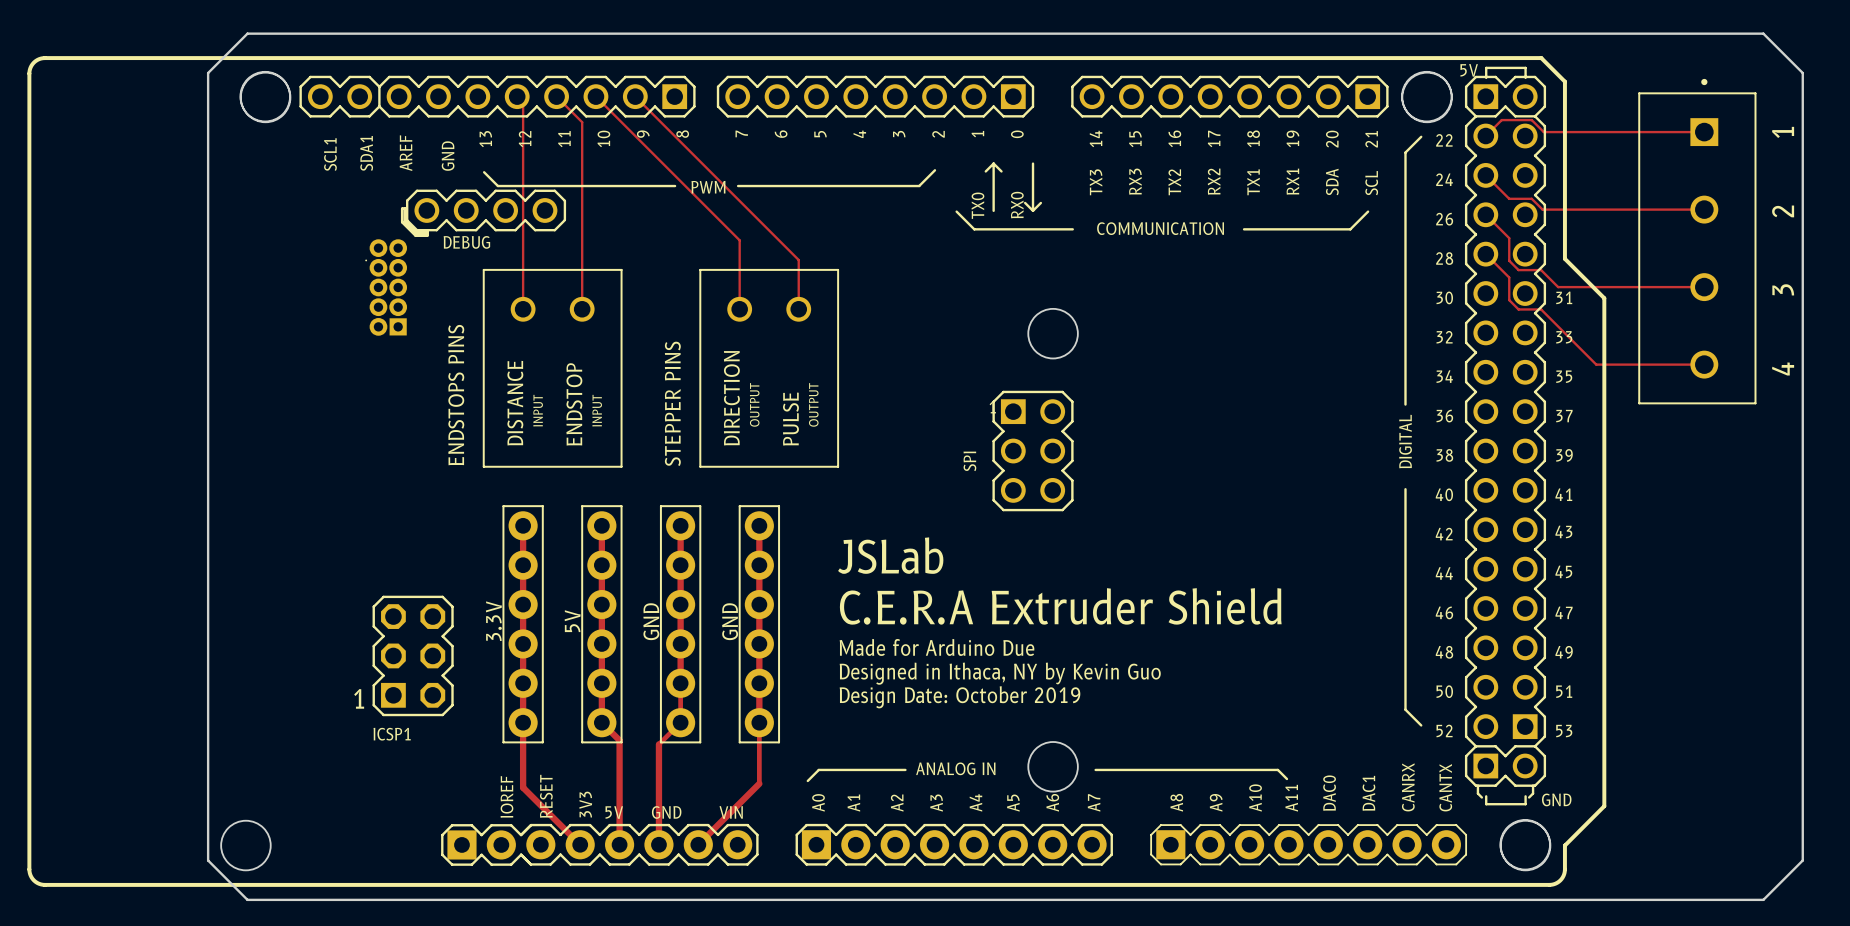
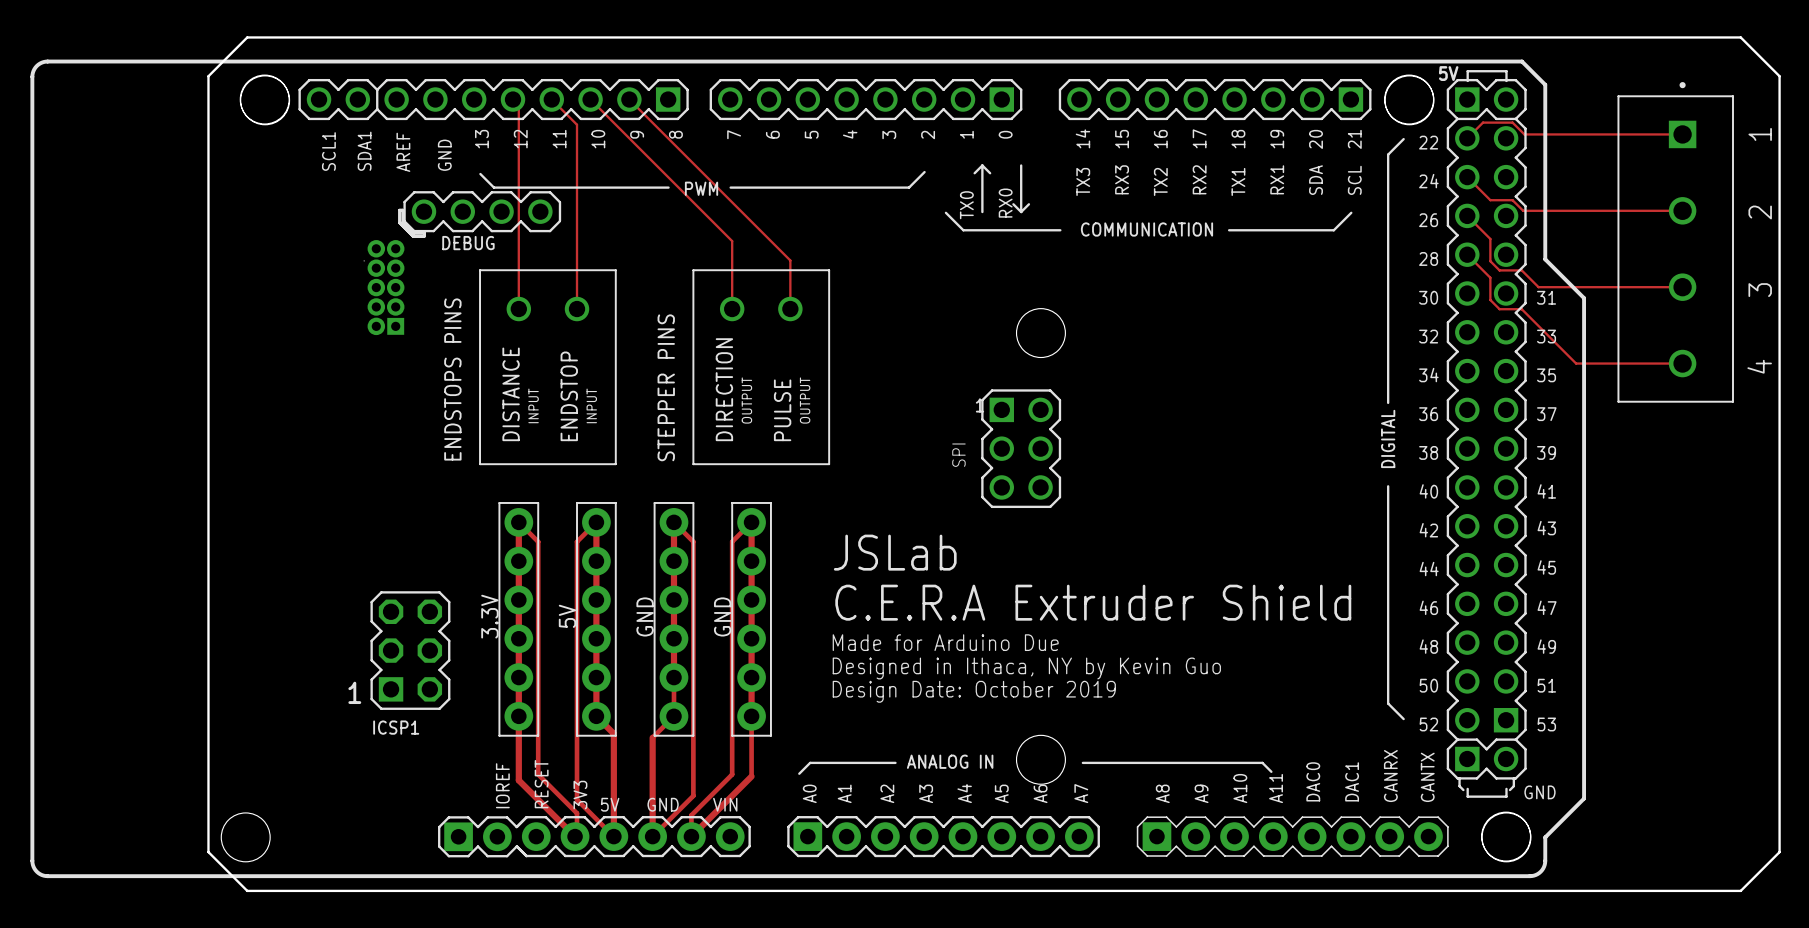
track: none -> (518, 522) (538, 541) (538, 774) (577, 813) (577, 834) (575, 836)
track: none -> (596, 522) (577, 541) (577, 799) (613, 836)
track: none -> (673, 522) (693, 541) (693, 795) (652, 836)
track: none -> (751, 522) (732, 541) (732, 774) (691, 815) (691, 836)

